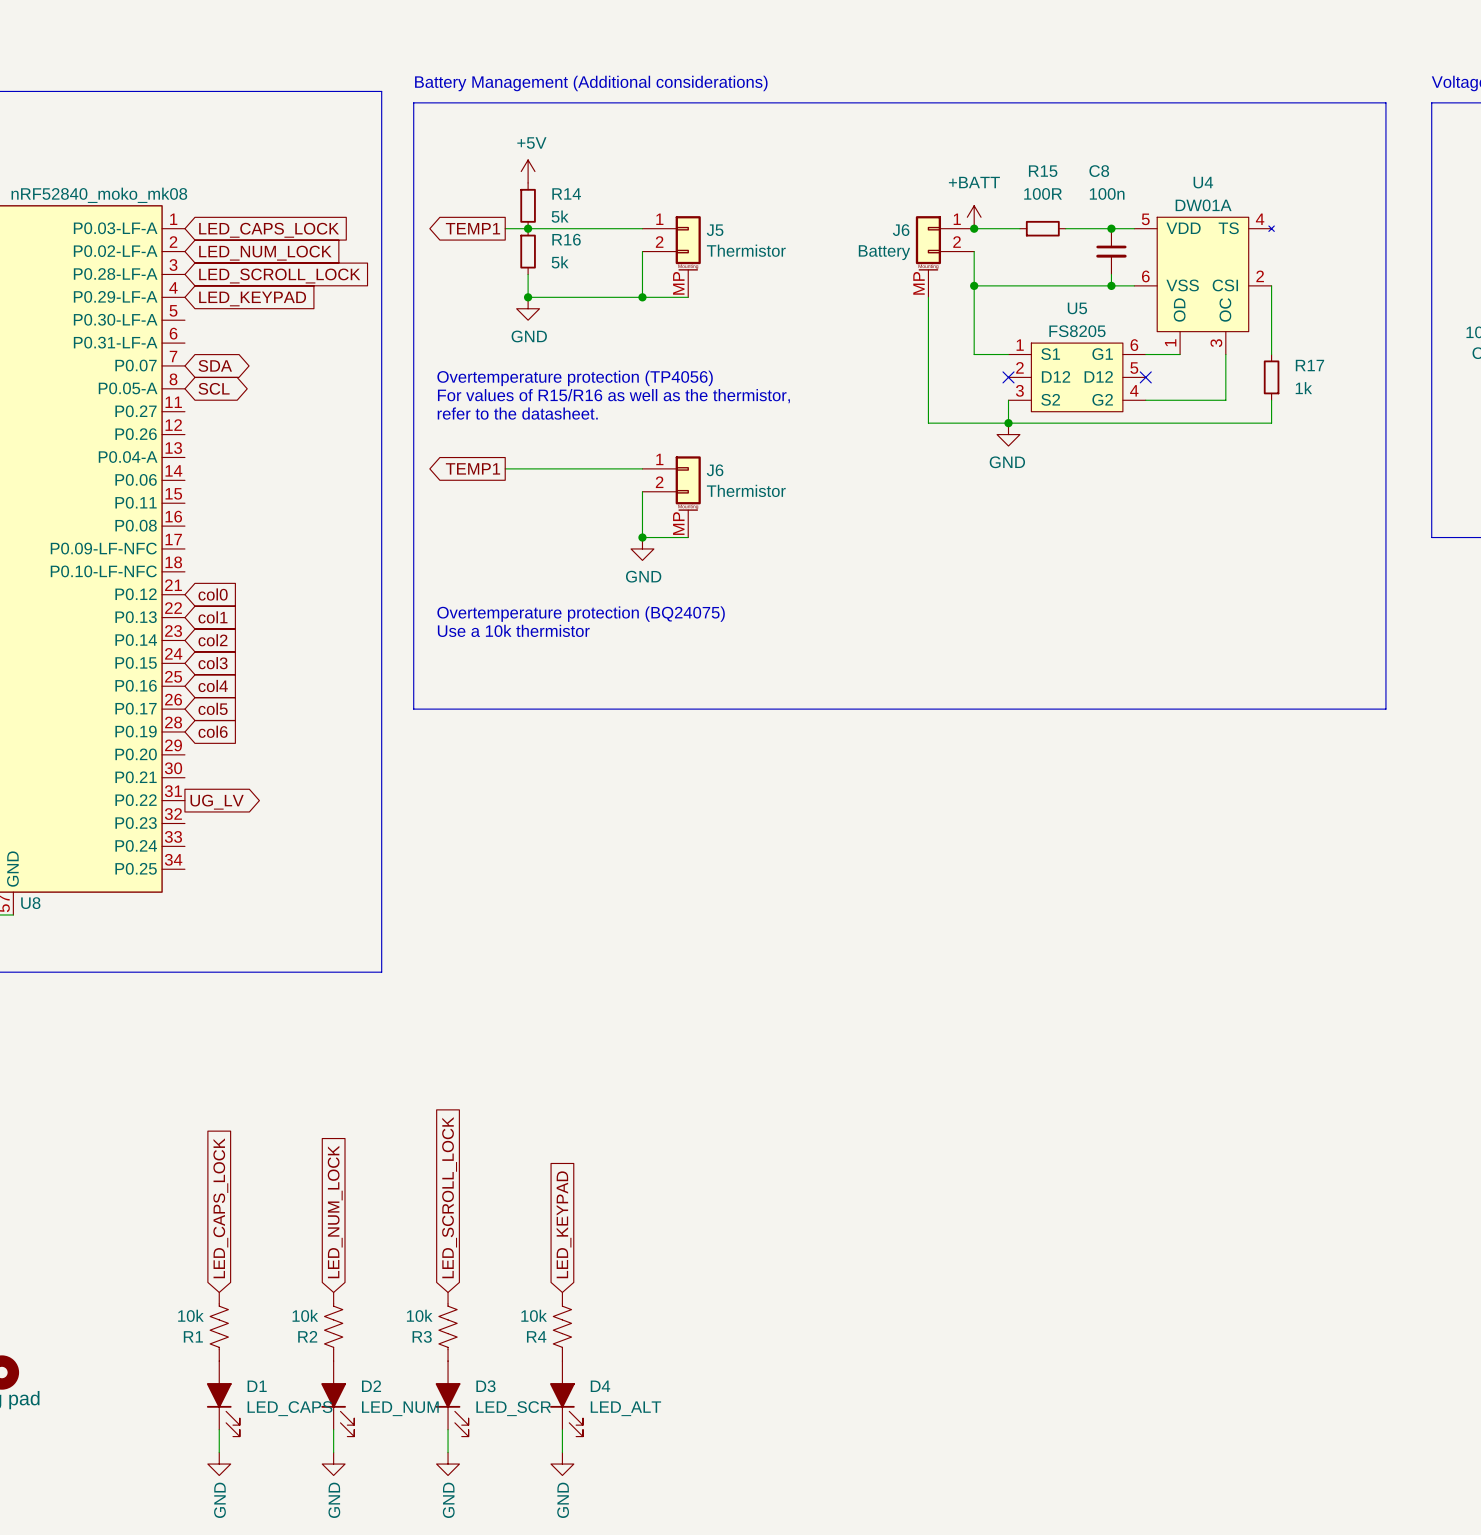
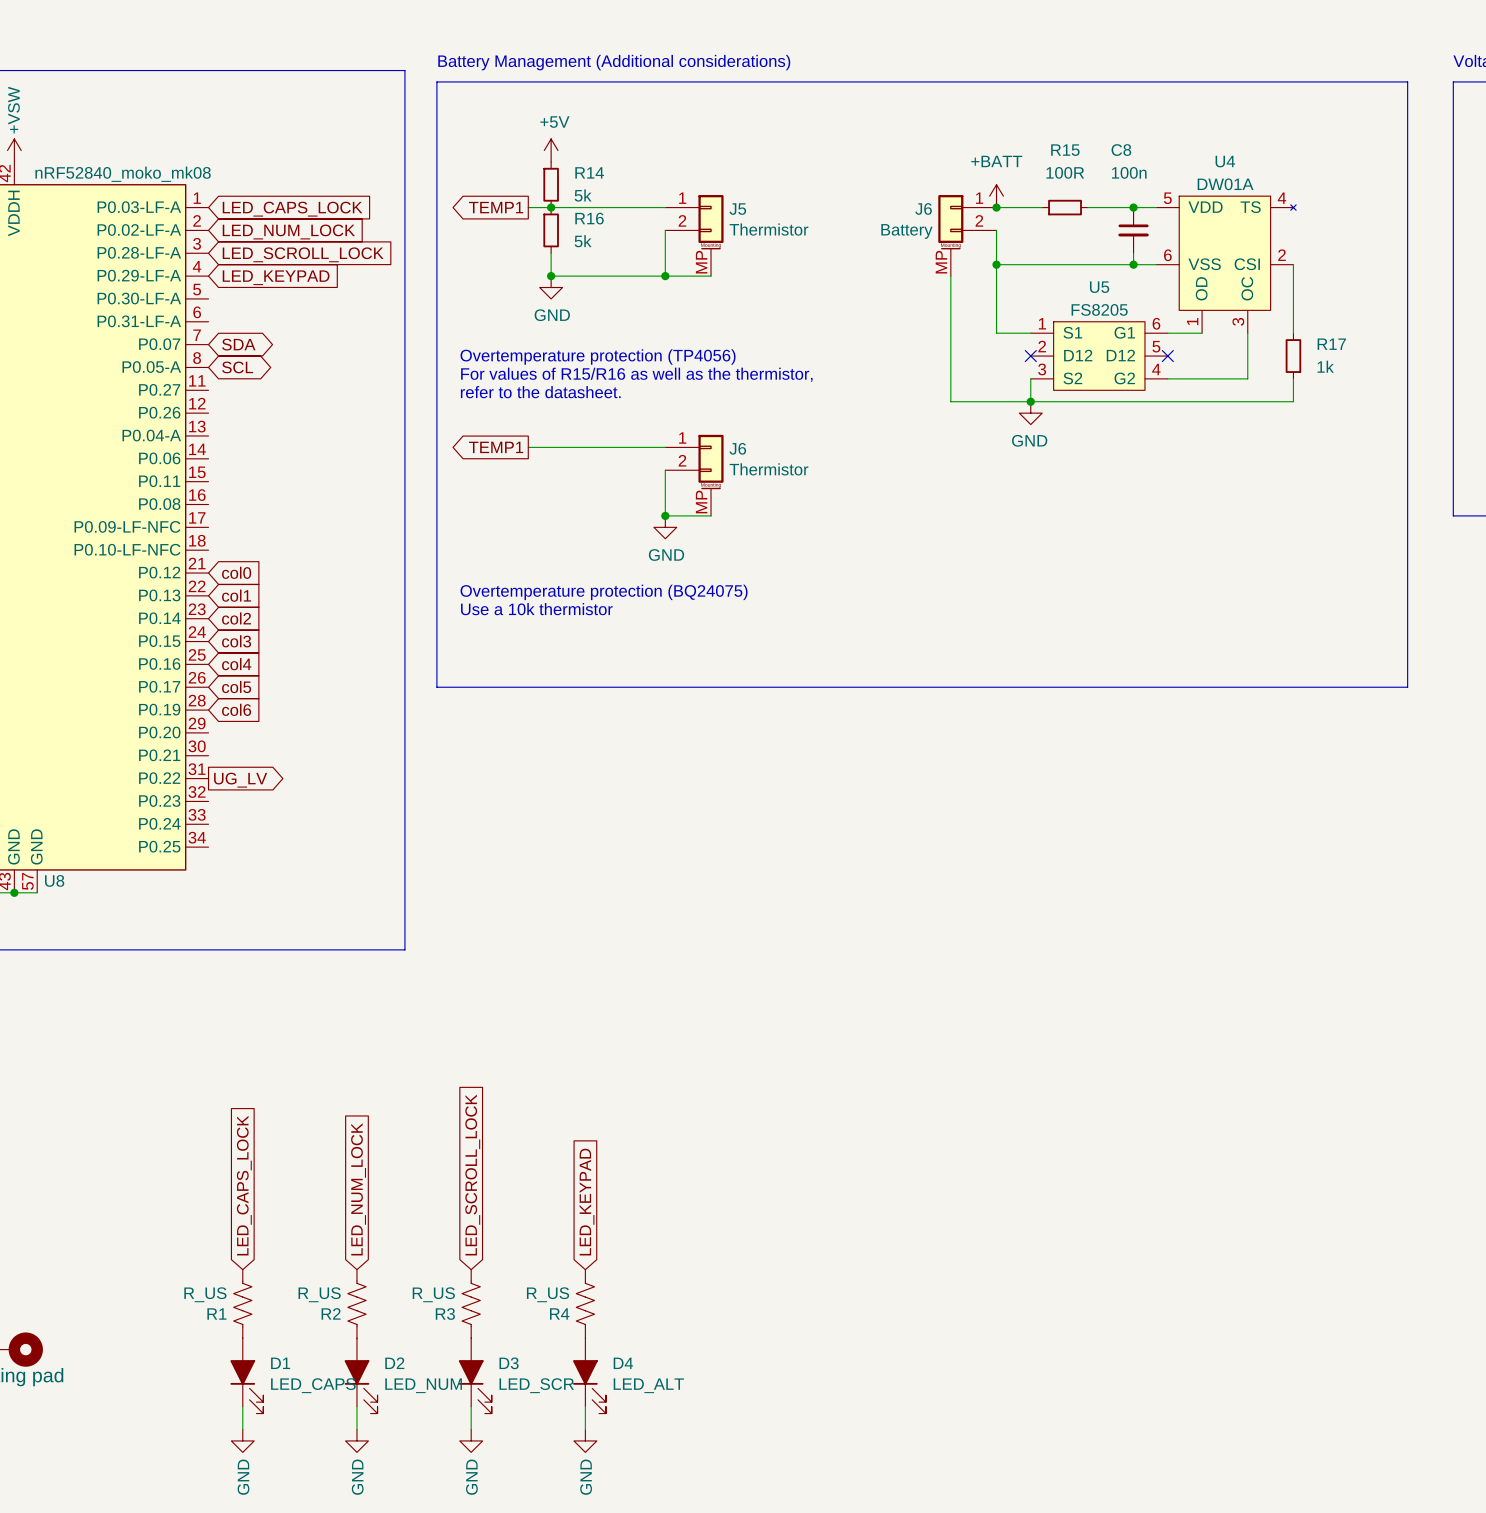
R1 value: 10k (190, 1315) -> R_US (205, 1294)
R2 value: 10k (305, 1315) -> R_US (319, 1294)
R3 value: 10k (419, 1315) -> R_US (433, 1294)
R4 value: 10k (534, 1315) -> R_US (548, 1294)

